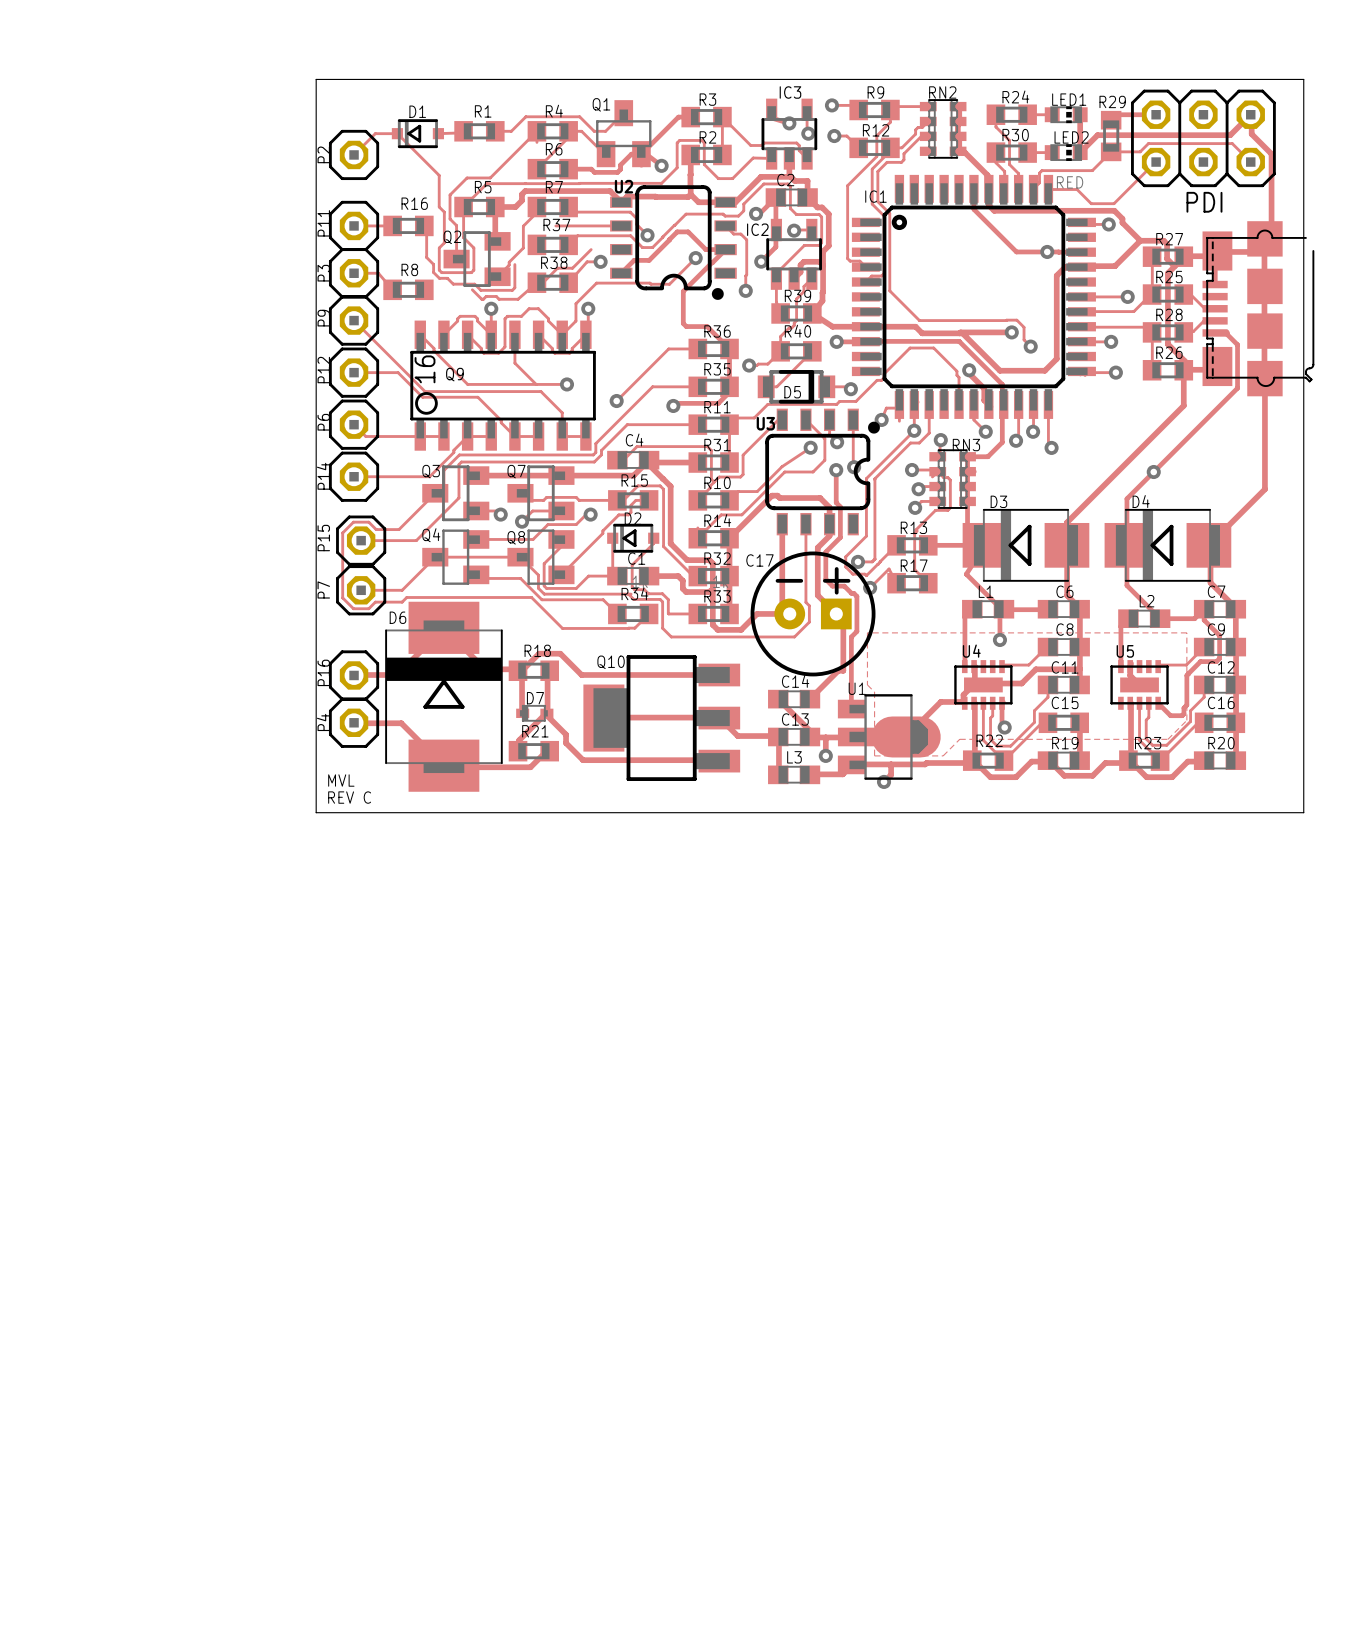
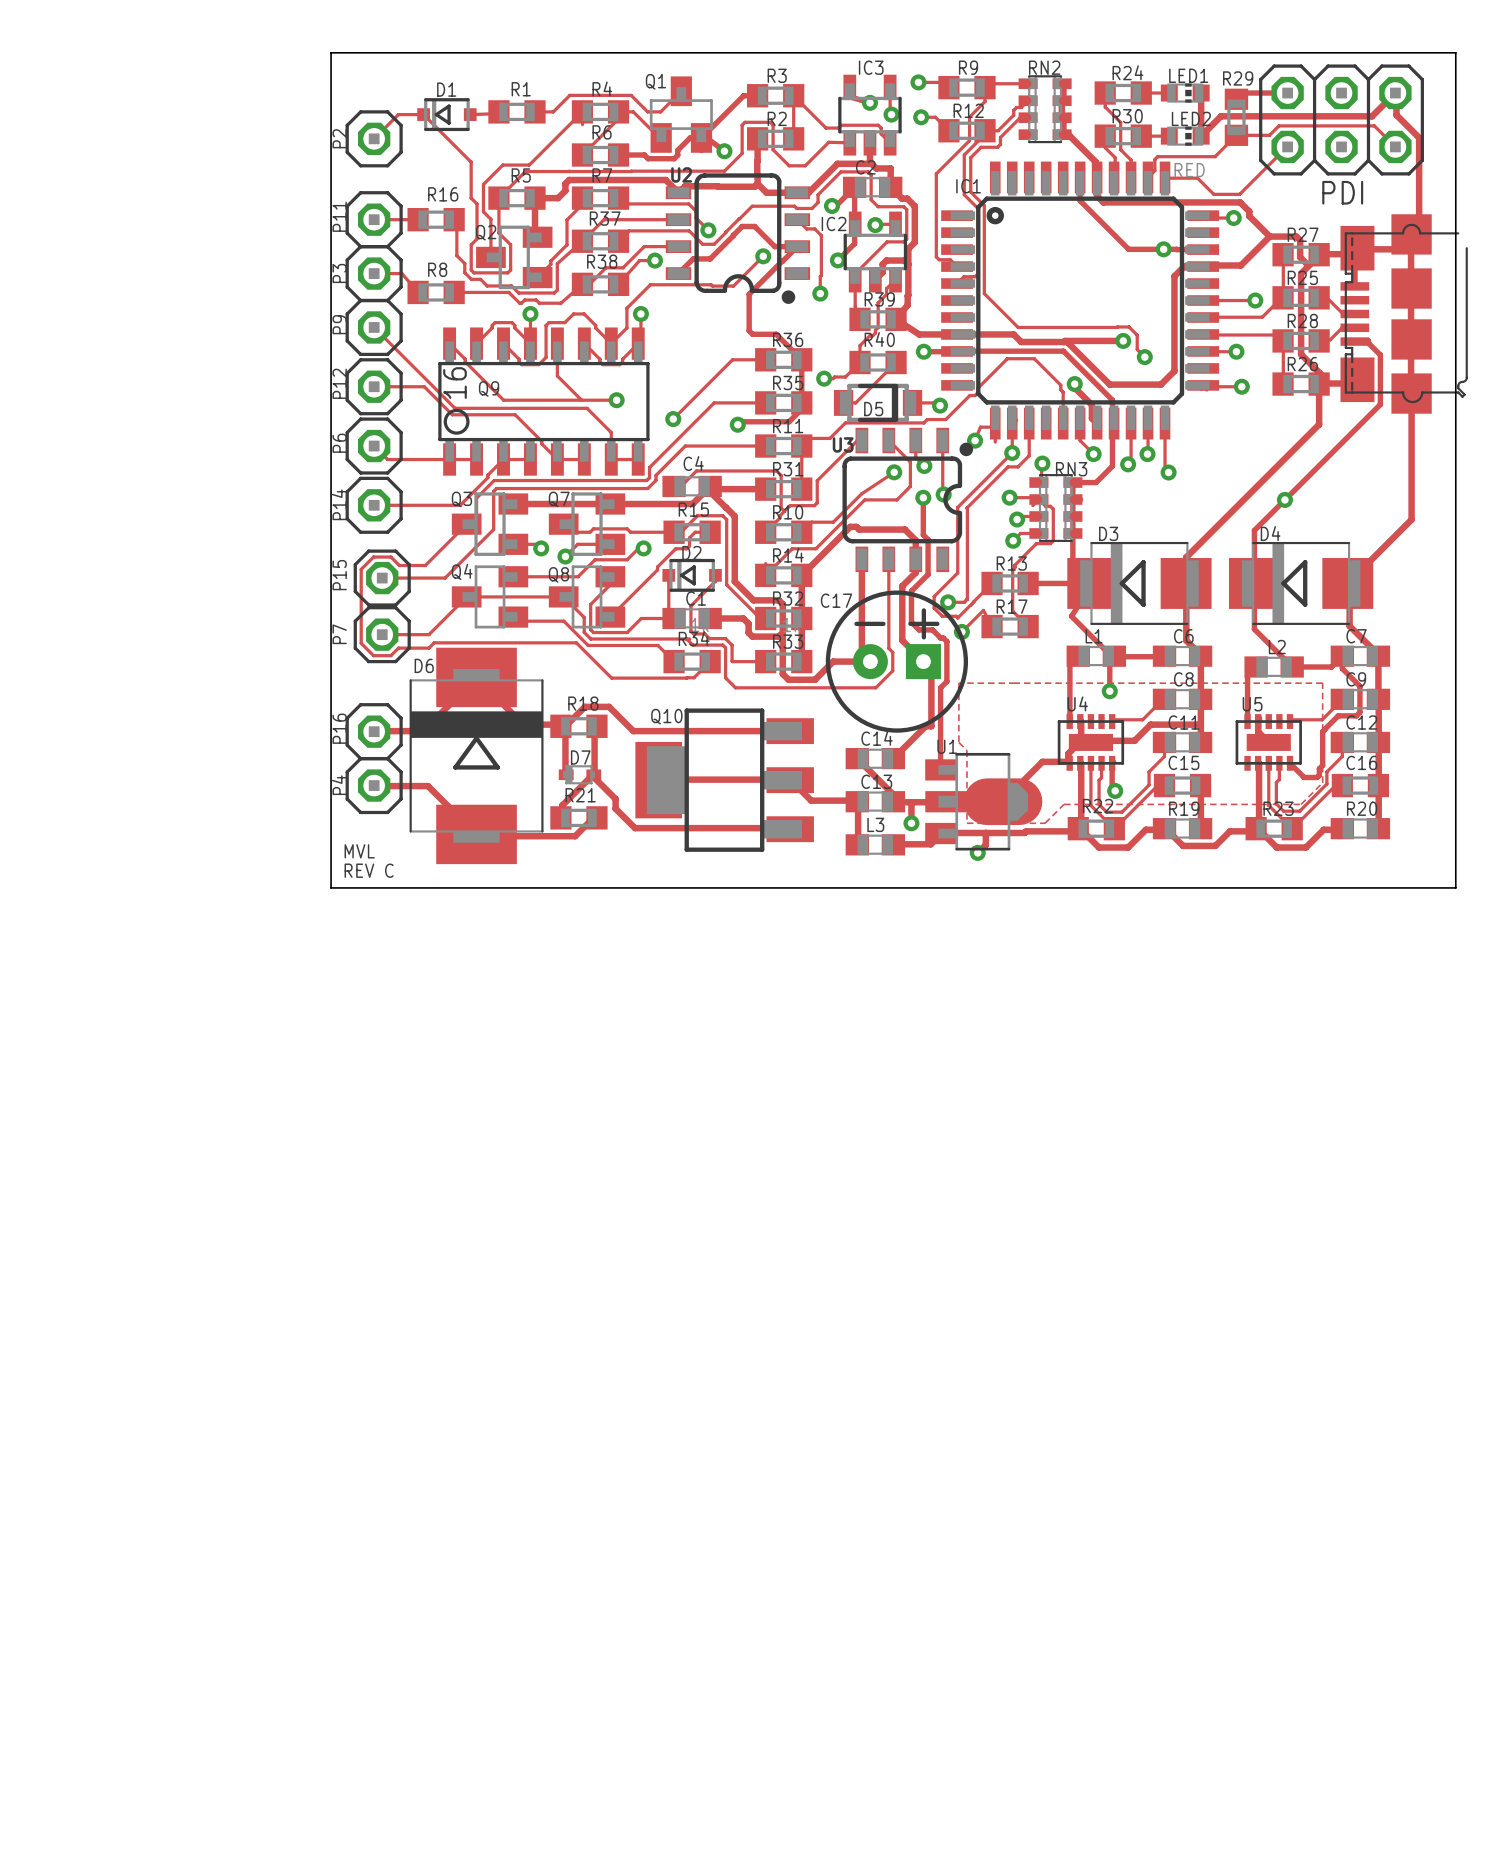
track: none -> (604, 219) (557, 263)
track: none -> (644, 246) (678, 246)
track: none -> (454, 292) (508, 292)

